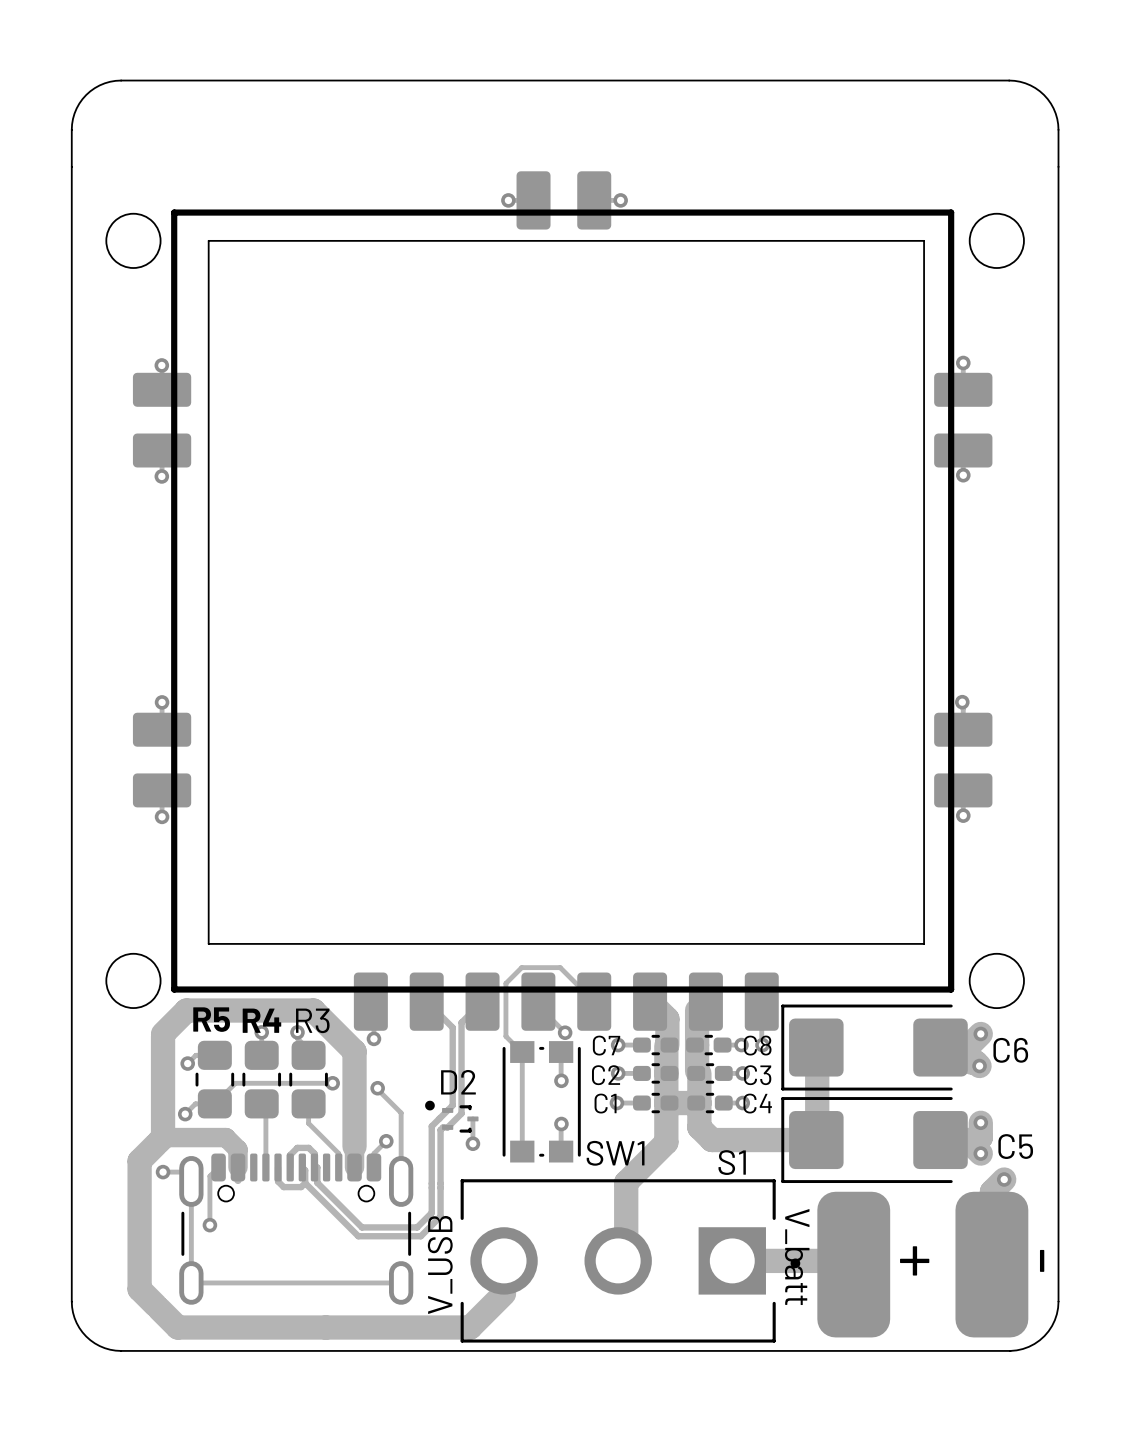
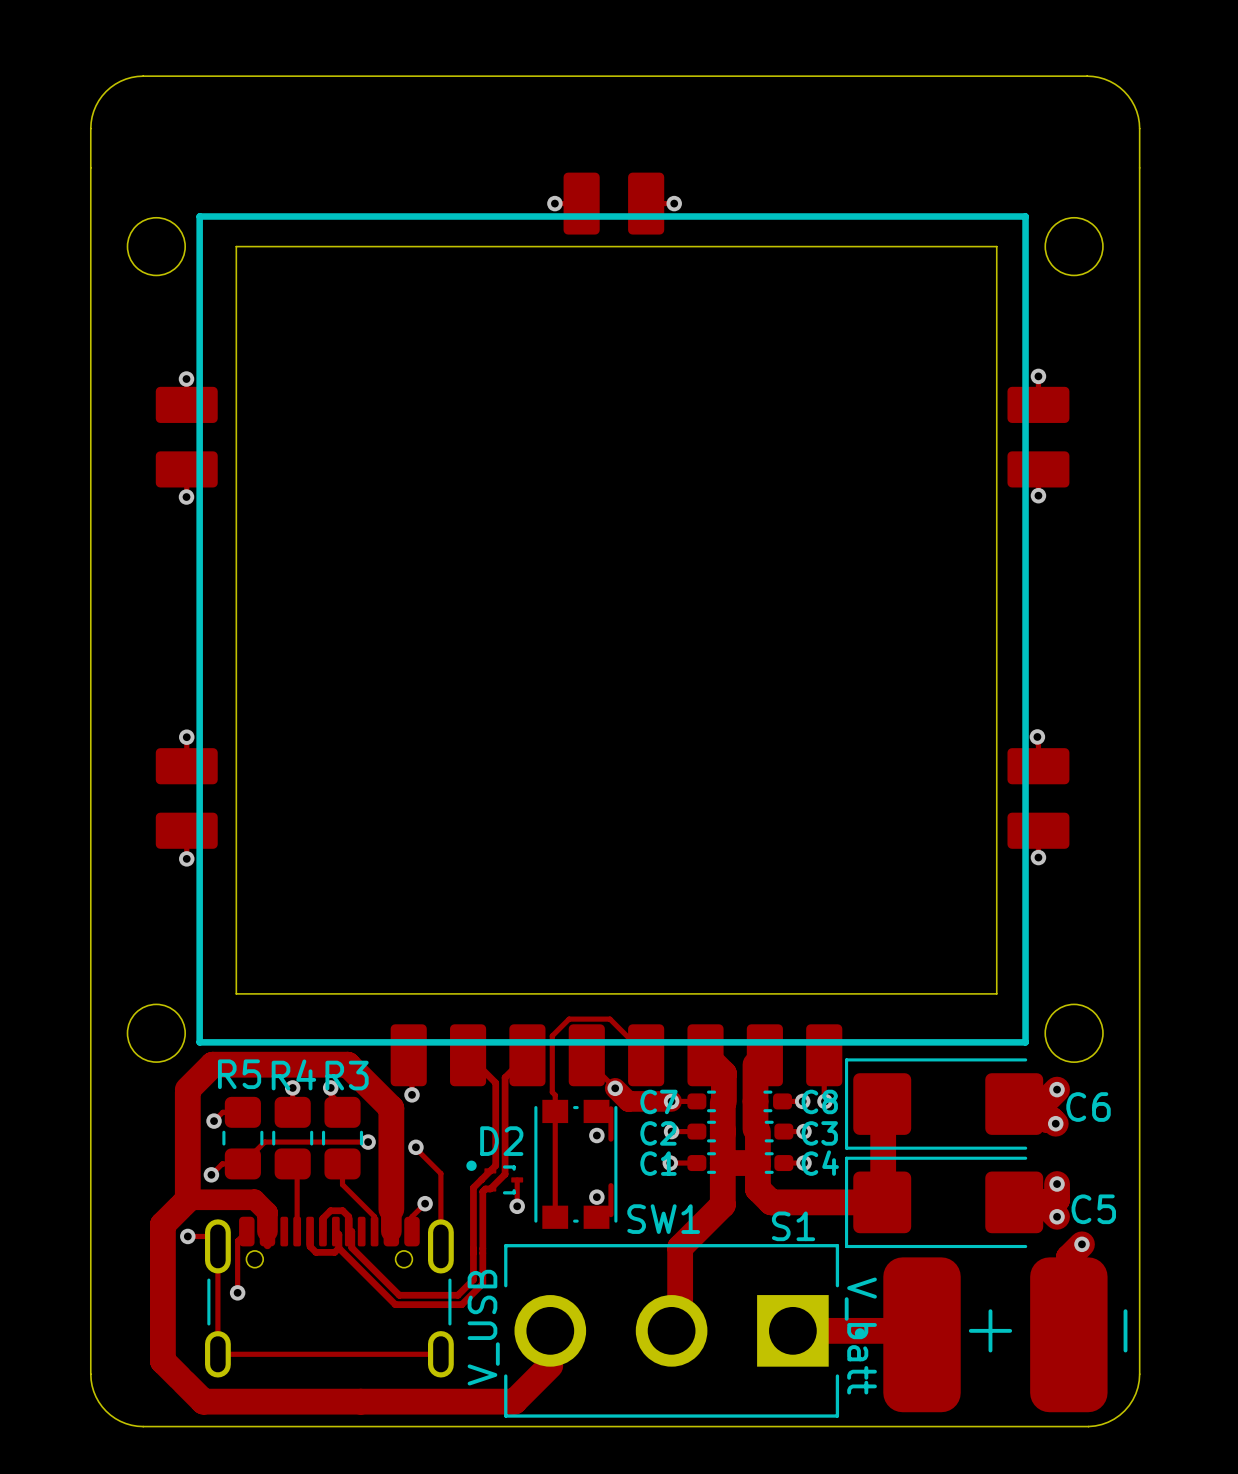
track: none -> (615, 1088) (628, 1101) (671, 1101)
track: (508, 1039) (522, 1052) (522, 1151) -> (555, 1095) (555, 1217)
via position: (561, 1080) -> (596, 1135)
part position: (541, 1101) -> (575, 1164)
via position: (561, 1124) -> (596, 1197)
text position: SW1 (615, 1153) -> SW1 (663, 1219)

